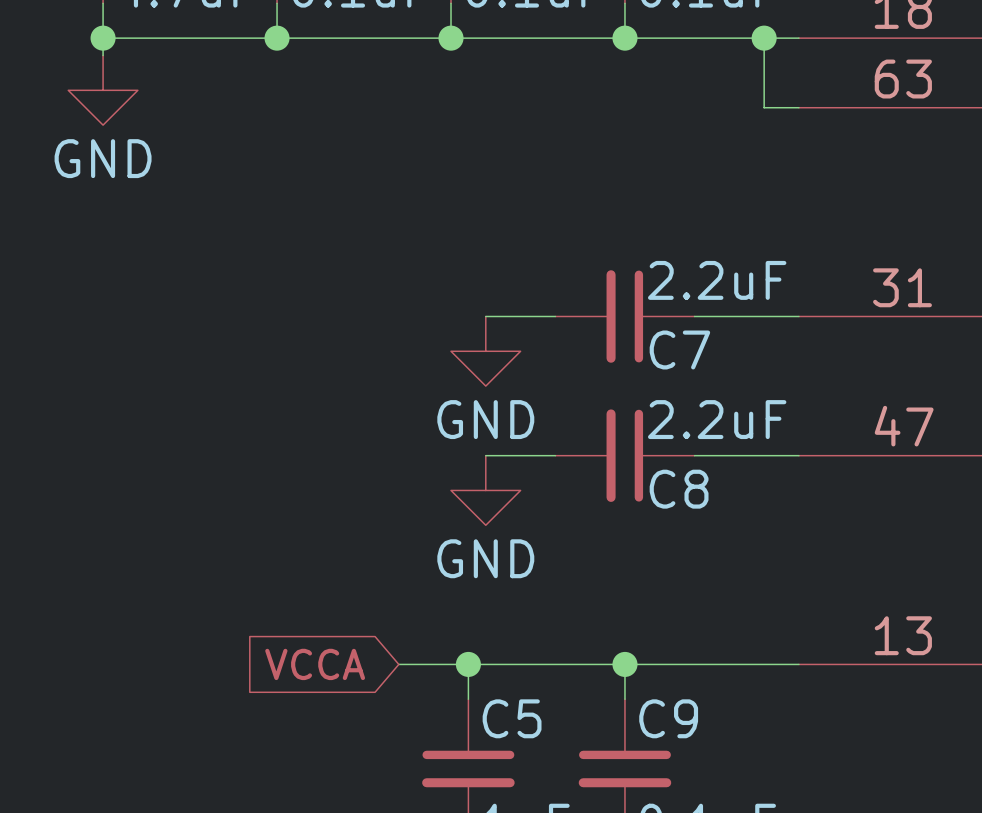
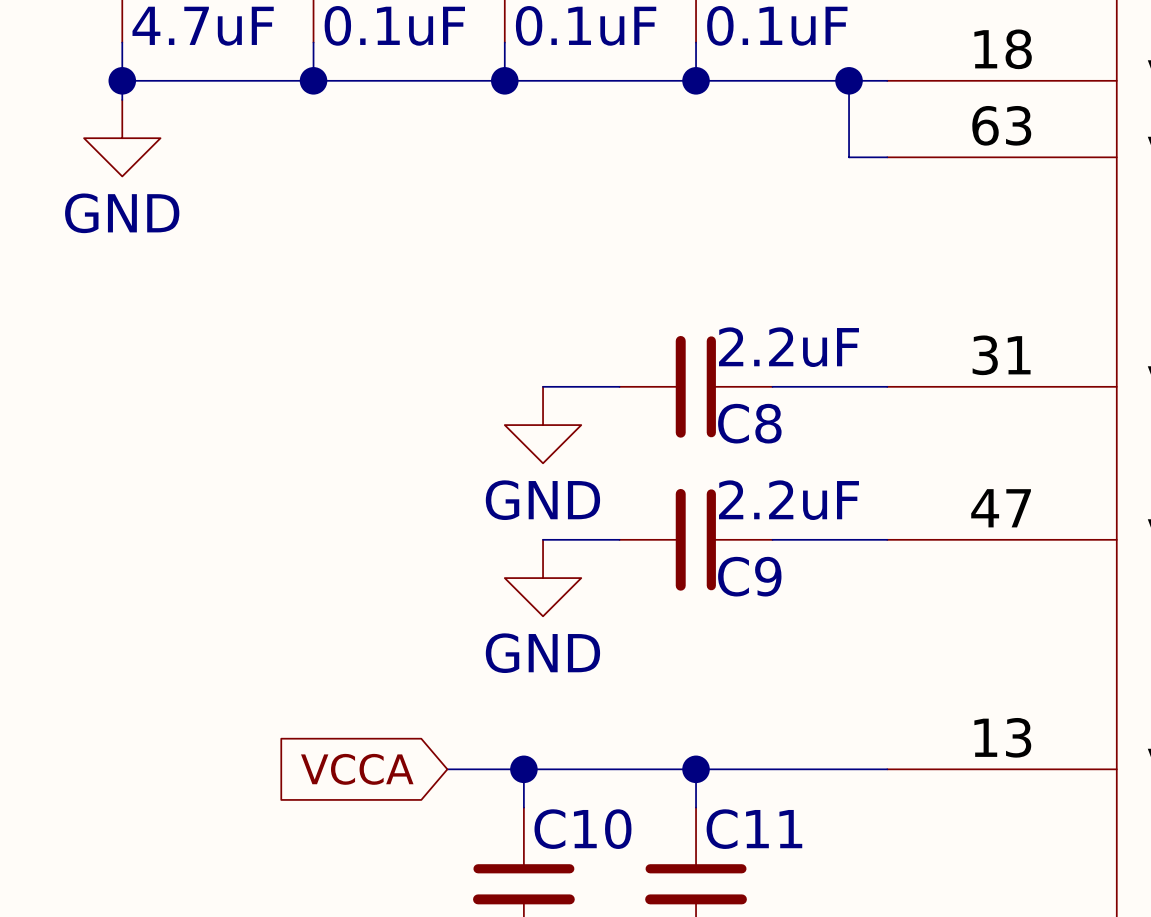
C7 name: C7 (679, 349) -> C8 (749, 423)
C8 name: C8 (679, 489) -> C9 (749, 576)
C5 name: C5 (512, 718) -> C10 (582, 829)
C9 name: C9 (668, 718) -> C11 (754, 829)

